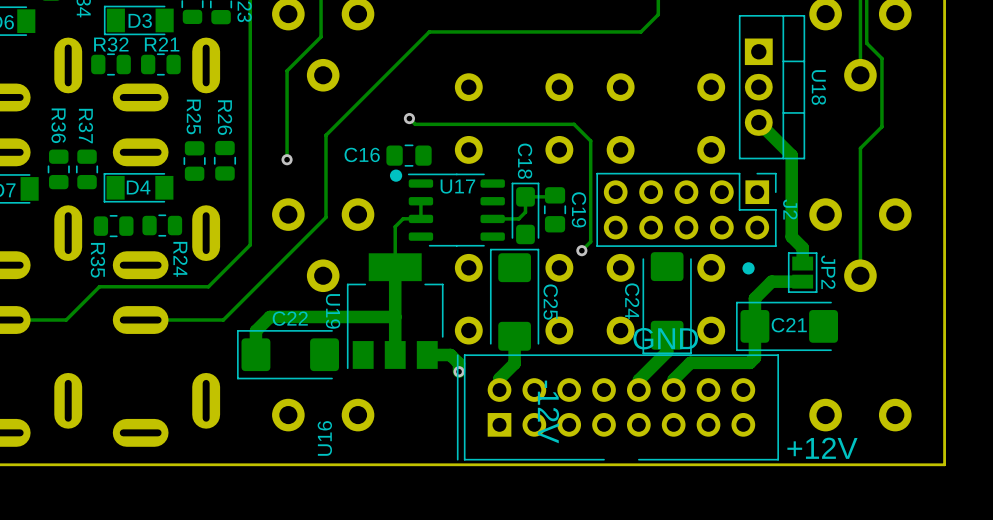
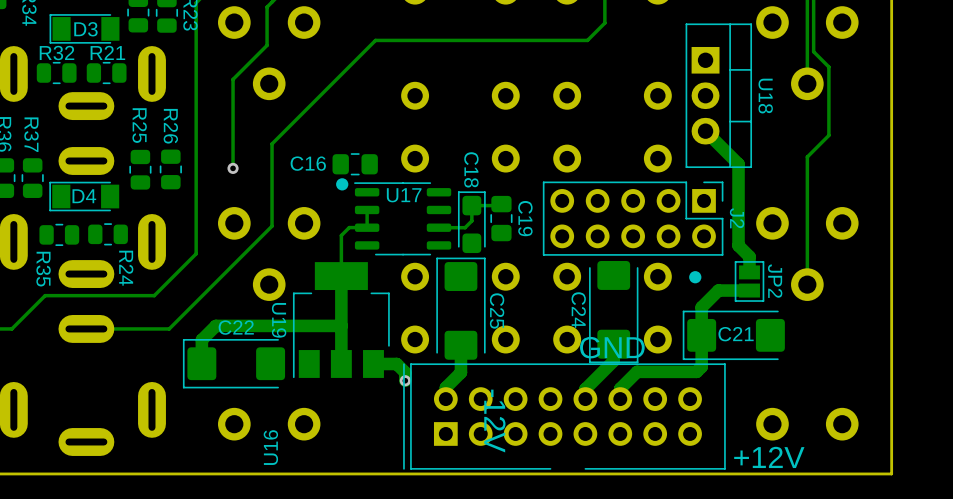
track: (409, 118) (415, 124) (574, 124) (590, 140) (590, 241) (581, 250) -> none
via: (409, 118) -> none
via: (581, 250) -> none

